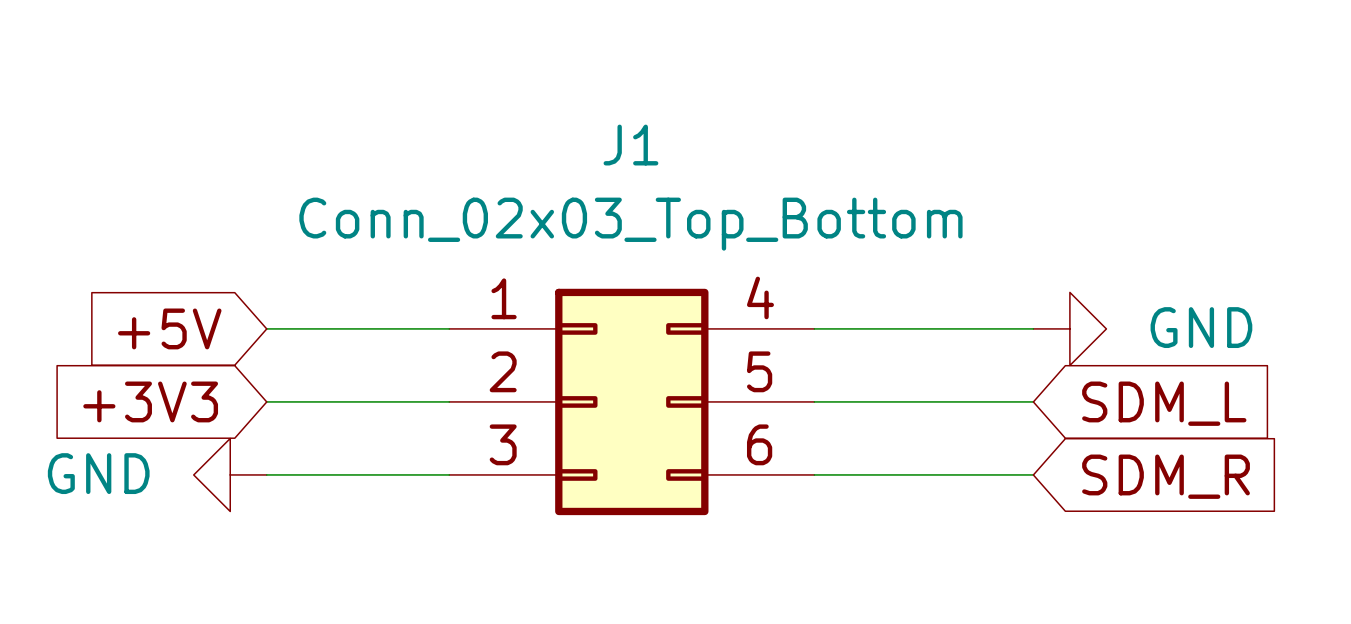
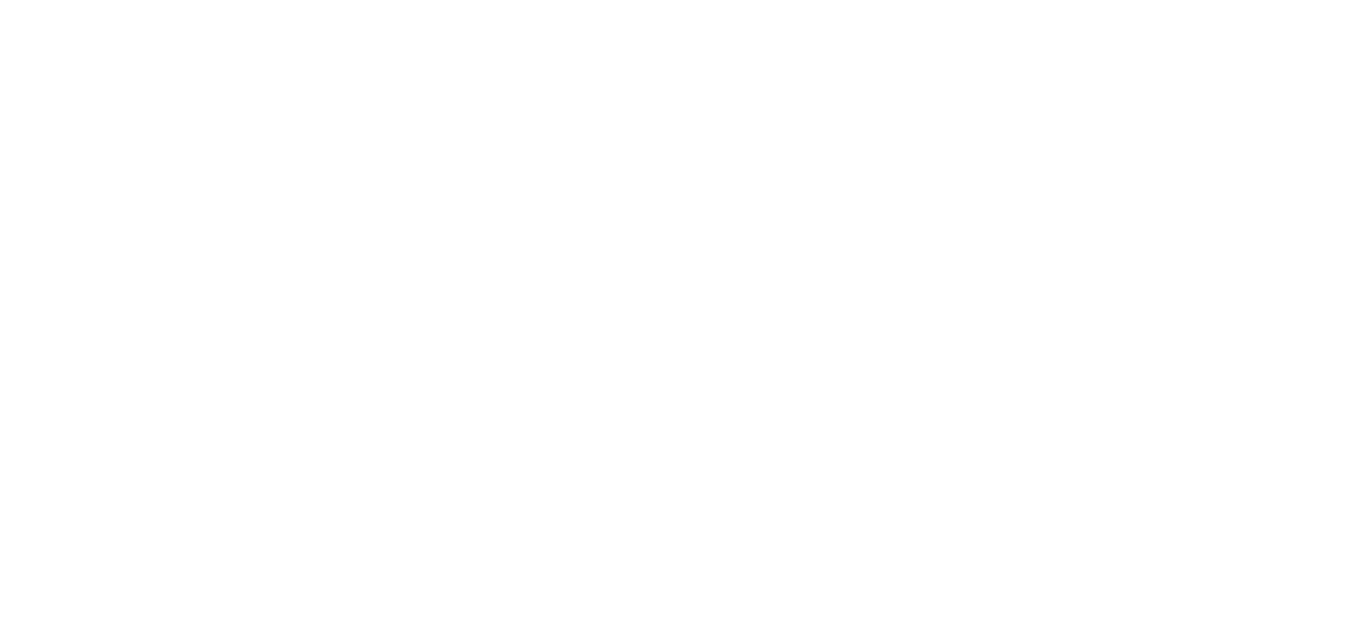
global label: +5V (169, 328) -> none
wire: (266, 328) (449, 328) -> none
wire: (814, 328) (1033, 328) -> none
power symbol: GND (1069, 328) -> none
global label: +3V3 (150, 401) -> none
wire: (266, 401) (449, 401) -> none
J1: Conn_02x03_Top_Bottom (631, 401) -> none
wire: (814, 401) (1033, 401) -> none
global label: SDM_L (1164, 403) -> none
power symbol: GND (230, 474) -> none
wire: (266, 474) (449, 474) -> none
wire: (814, 474) (1033, 474) -> none
global label: SDM_R (1166, 476) -> none

